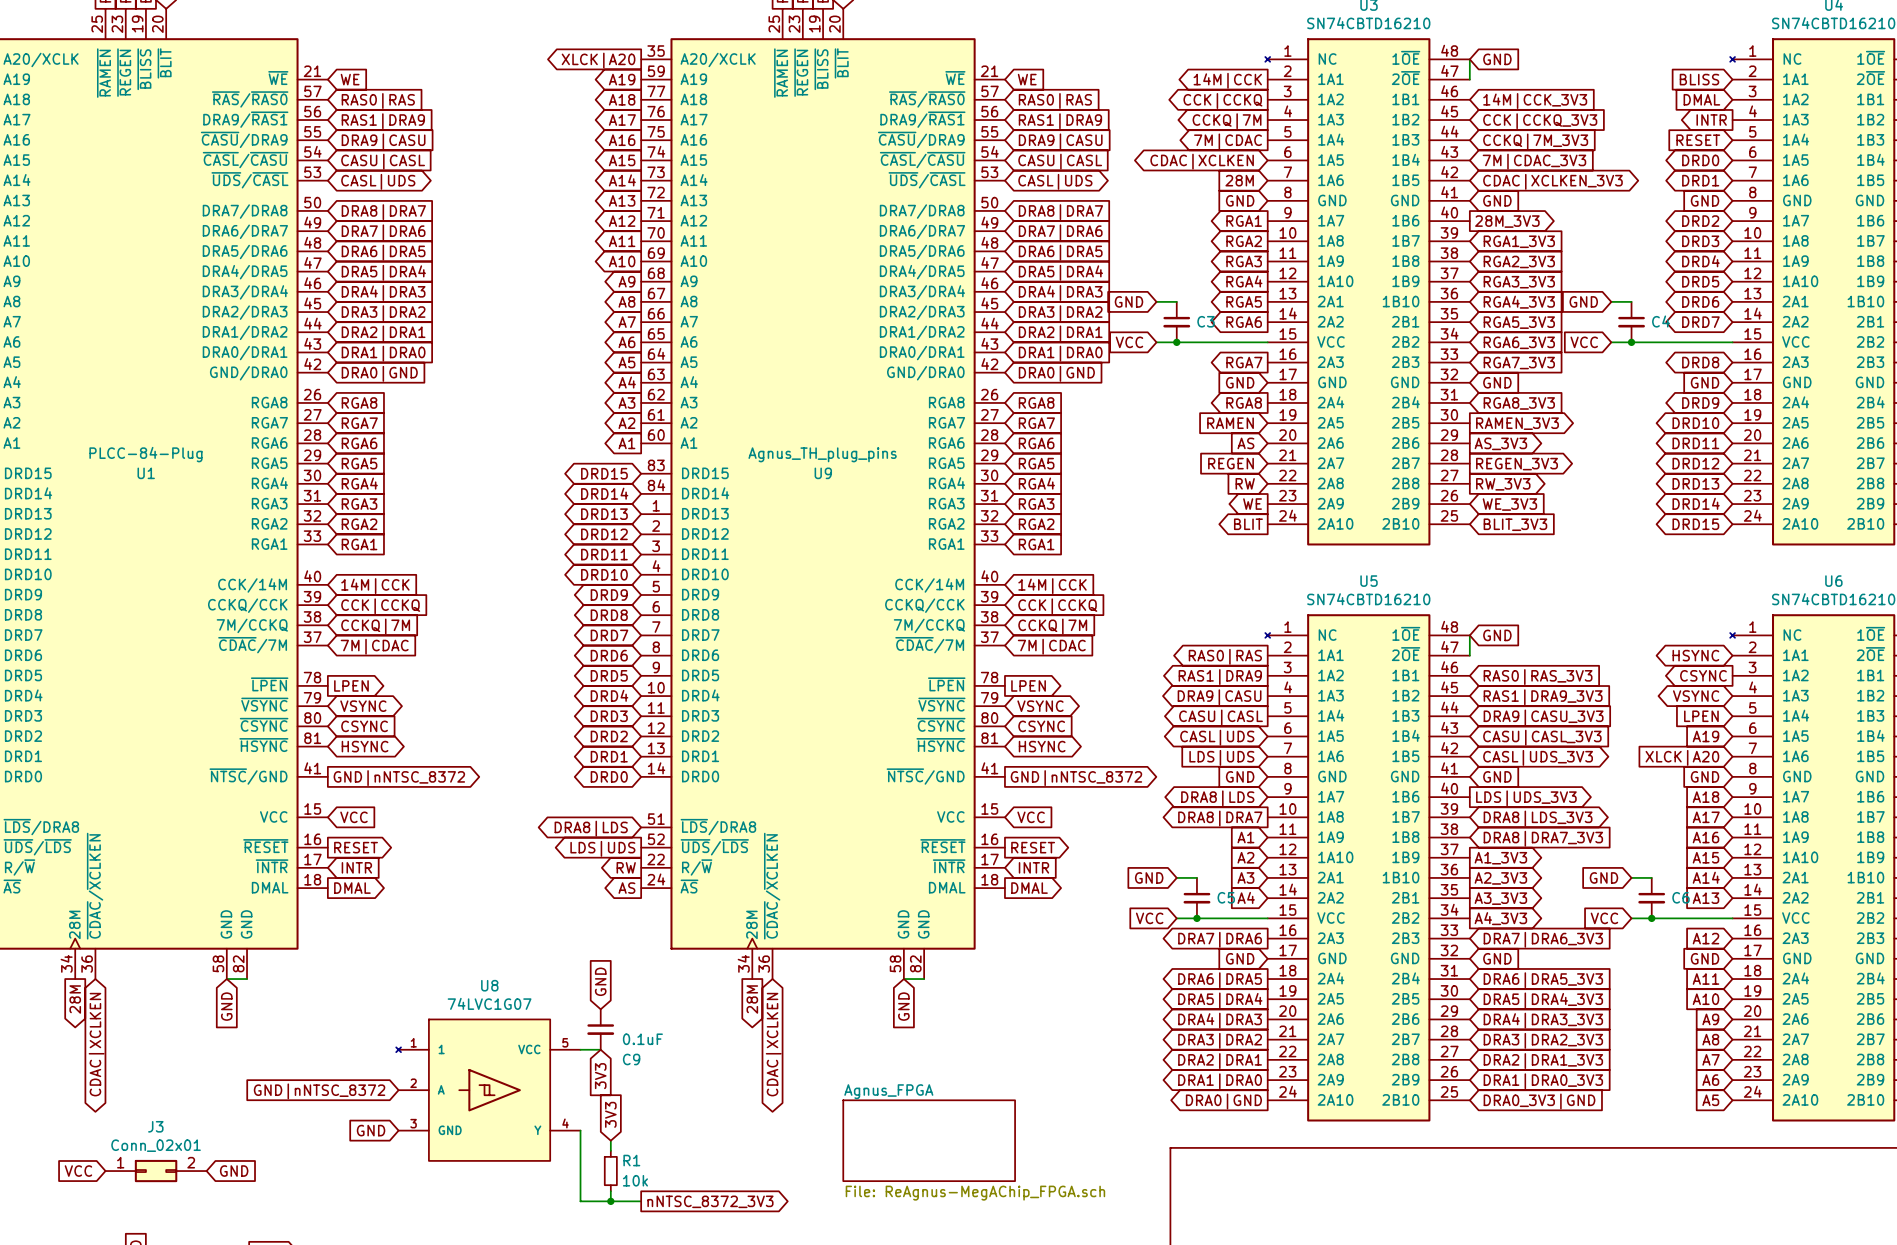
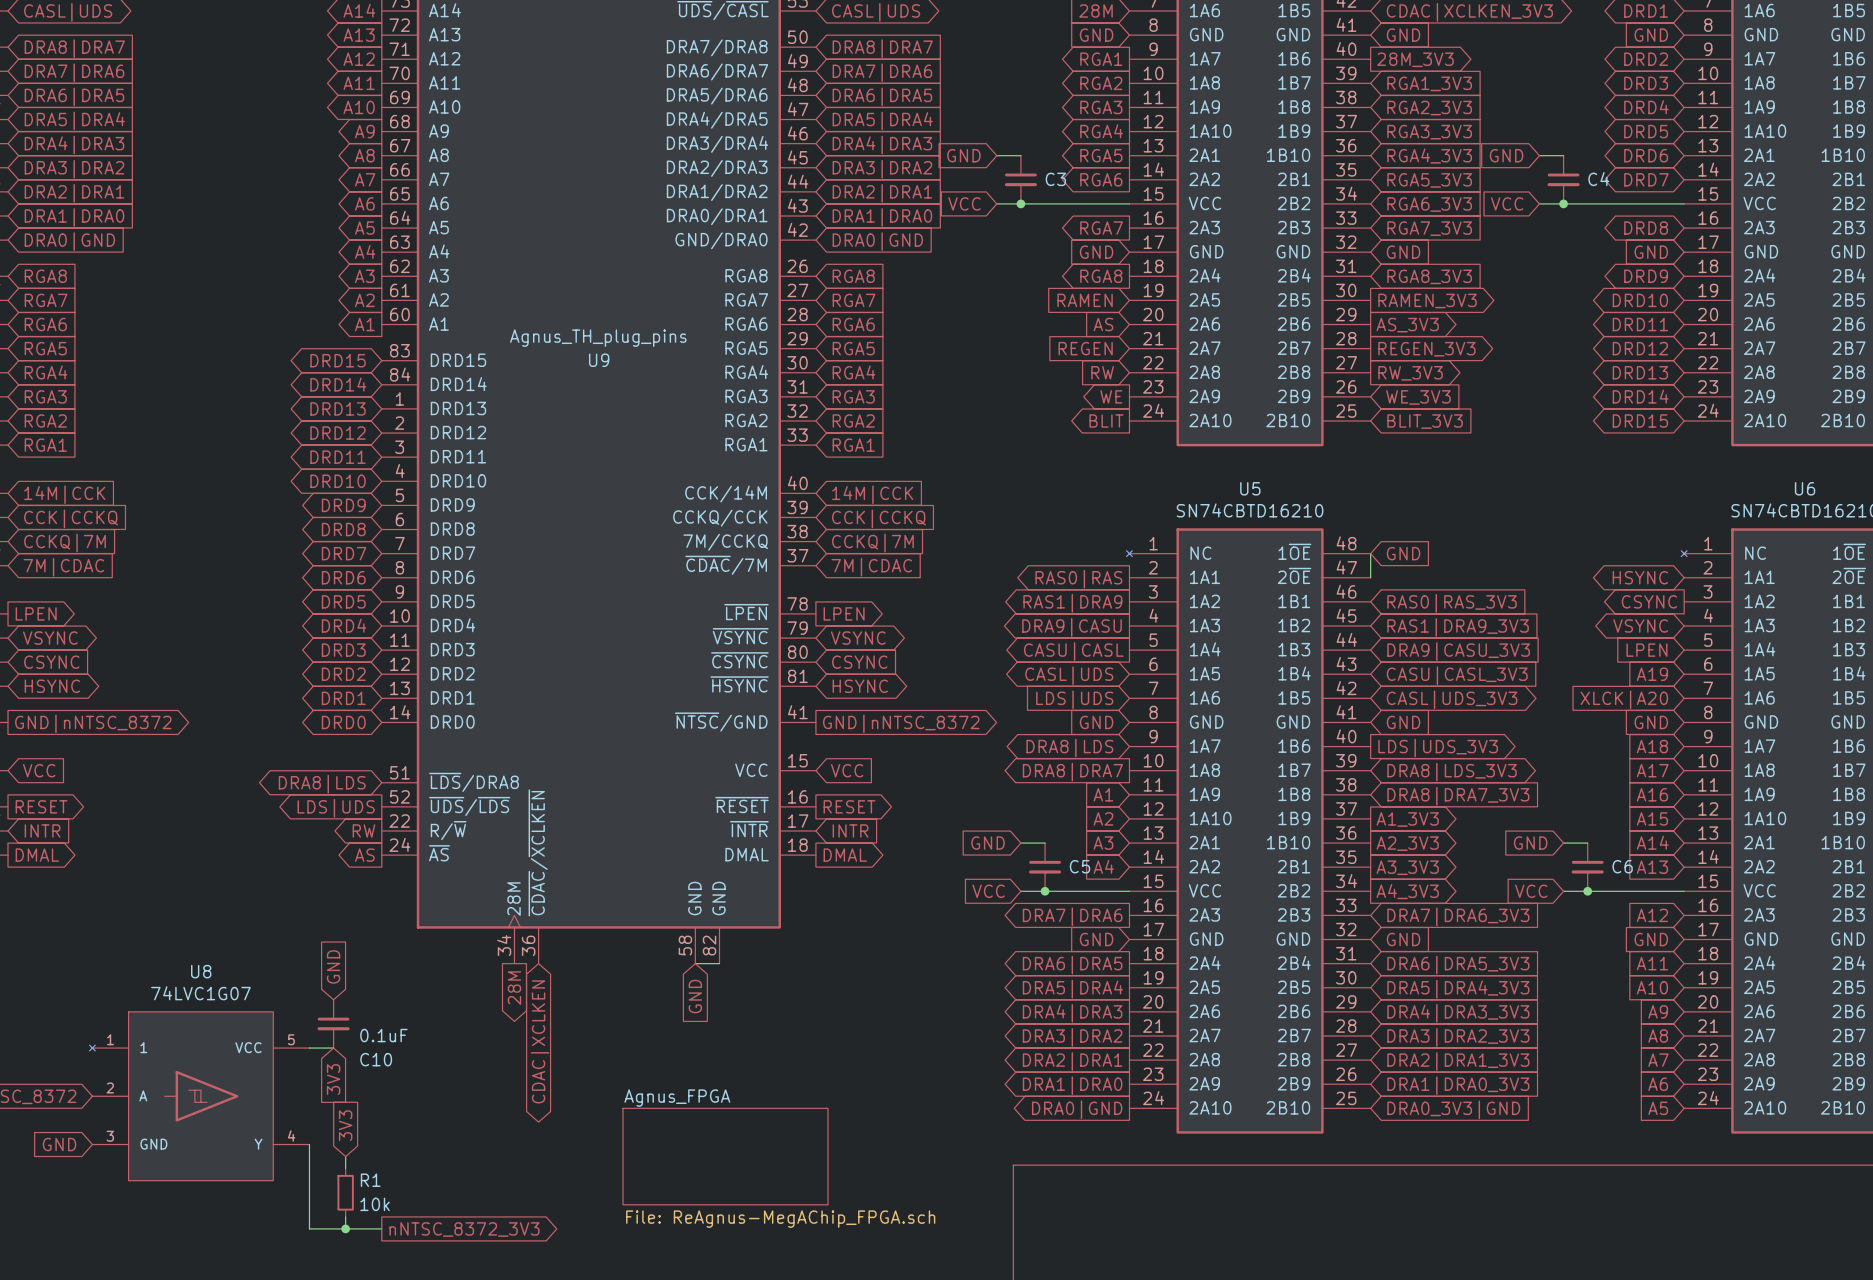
C9 name: C9 (631, 1059) -> C10 (376, 1059)

